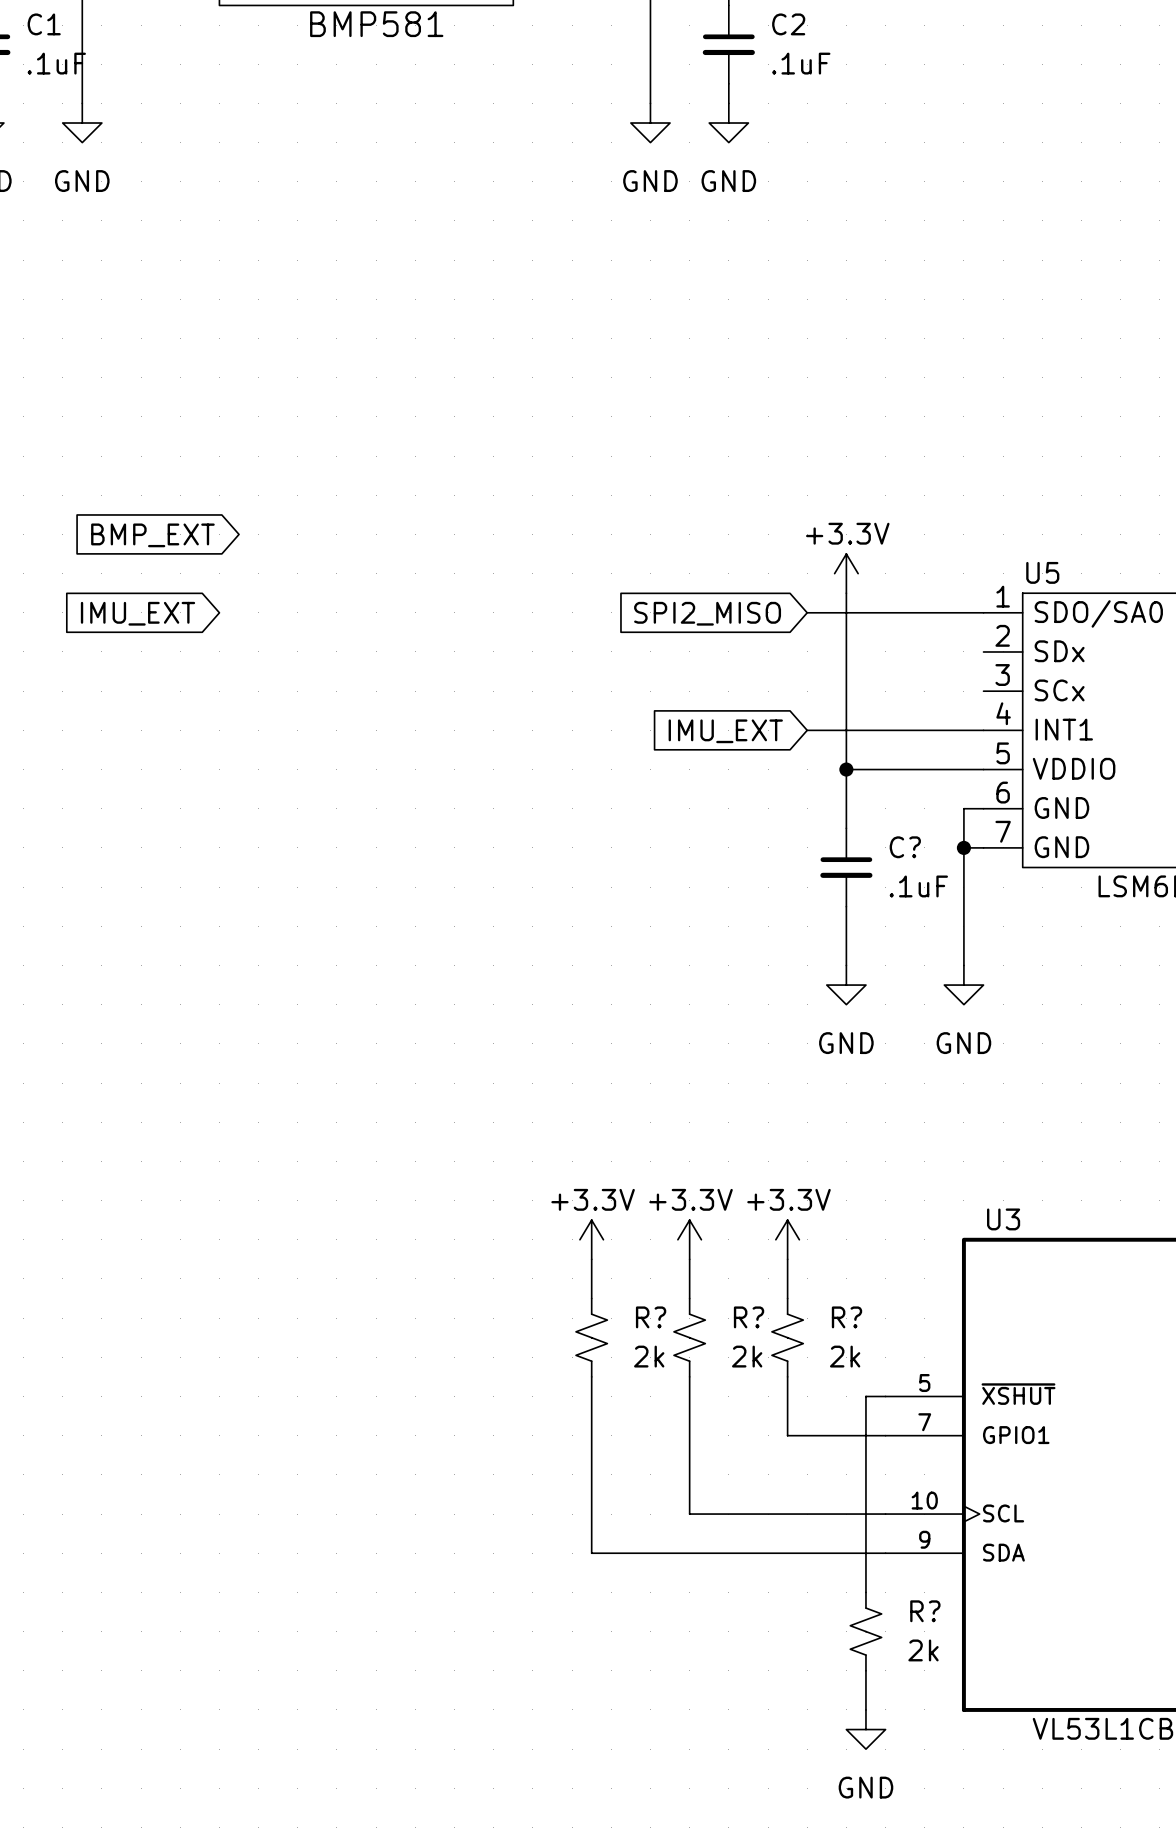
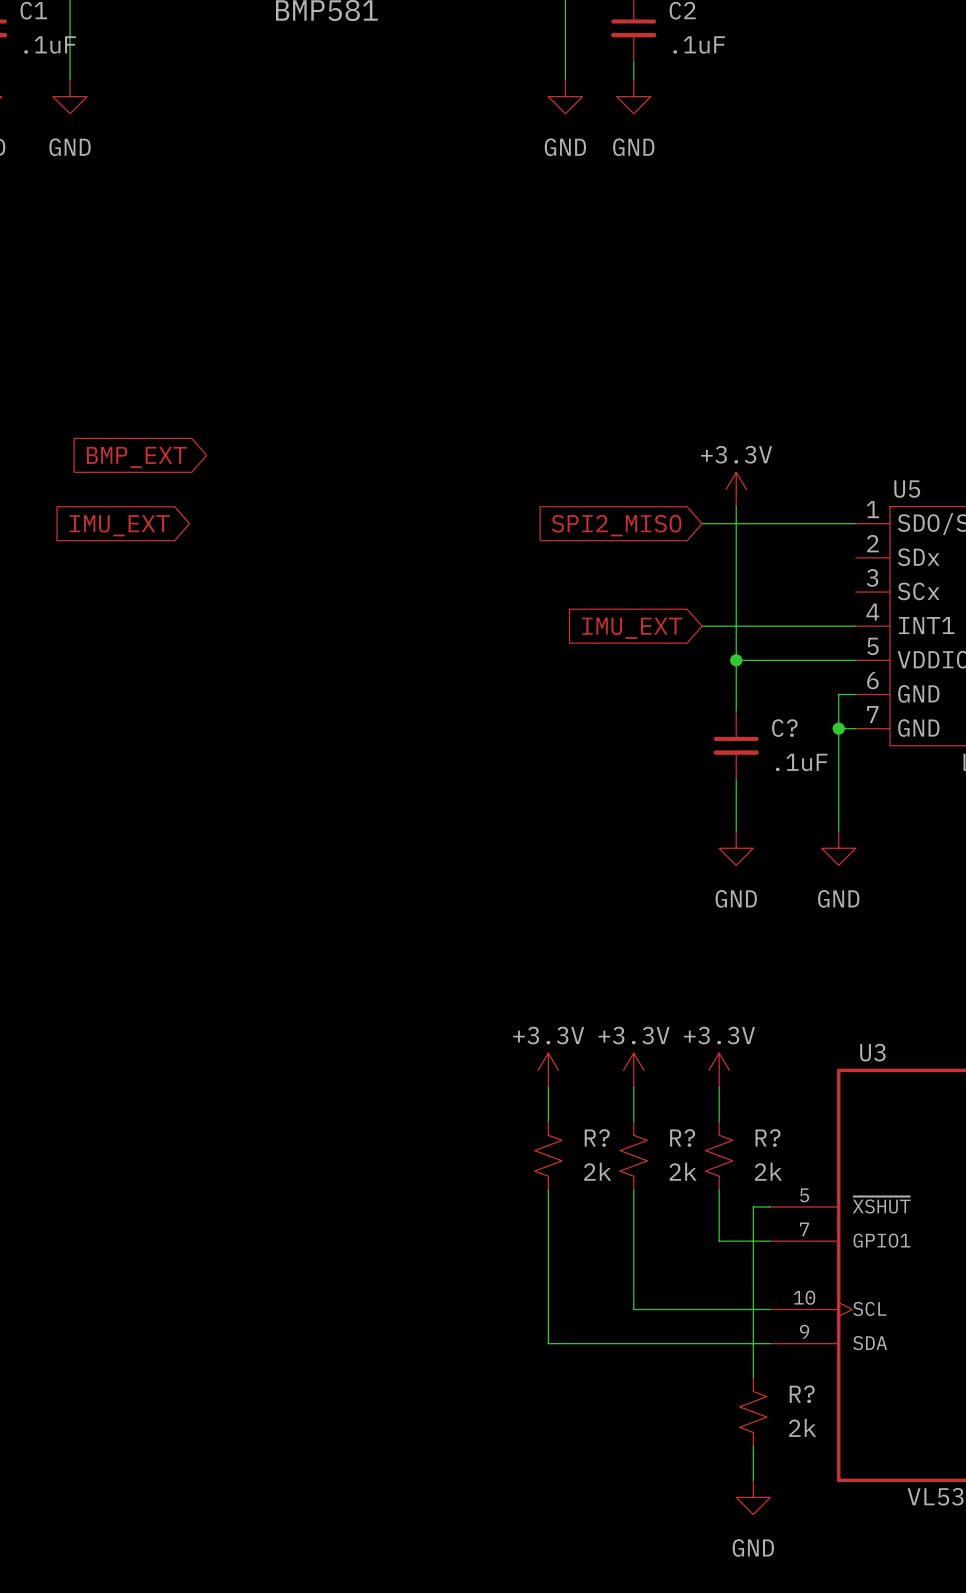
power symbol: +3.3V (591, 1239) -> none
power symbol: none -> +3.3V (548, 1070)
power symbol: +3.3V (689, 1239) -> none
power symbol: none -> +3.3V (633, 1070)
power symbol: +3.3V (787, 1239) -> none
power symbol: none -> +3.3V (719, 1070)
wire: (591, 1259) (591, 1298) -> (548, 1087) (548, 1121)
wire: (689, 1259) (689, 1298) -> (633, 1087) (633, 1121)
wire: (787, 1259) (787, 1298) -> (719, 1087) (719, 1121)
R?: 2k (591, 1337) -> none
R?: none -> 2k (548, 1155)
R?: 2k (689, 1337) -> none
R?: none -> 2k (633, 1155)
R?: 2k (787, 1337) -> none
R?: none -> 2k (719, 1155)
wire: (591, 1376) (591, 1553) (630, 1553) -> (548, 1189) (548, 1343)
wire: (689, 1376) (689, 1514) (728, 1514) -> (633, 1189) (633, 1309)
wire: (787, 1376) (787, 1435) (826, 1435) -> (719, 1189) (719, 1241)

